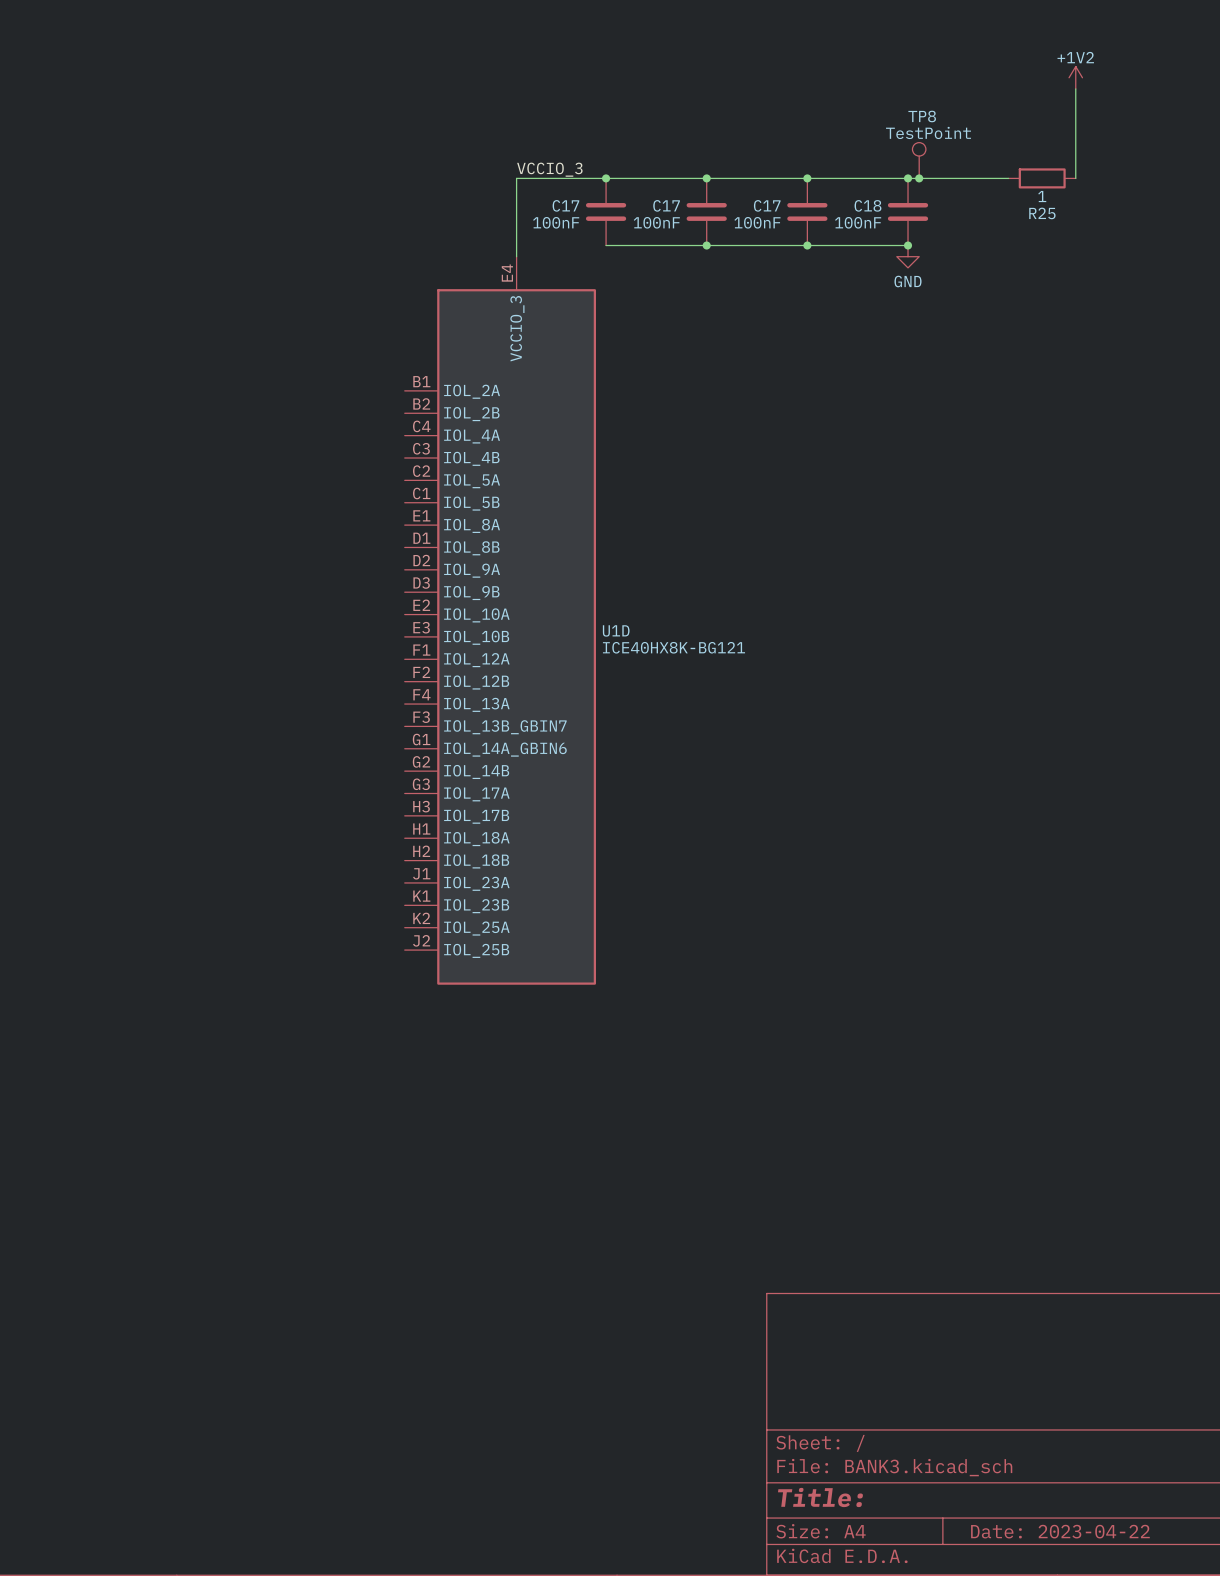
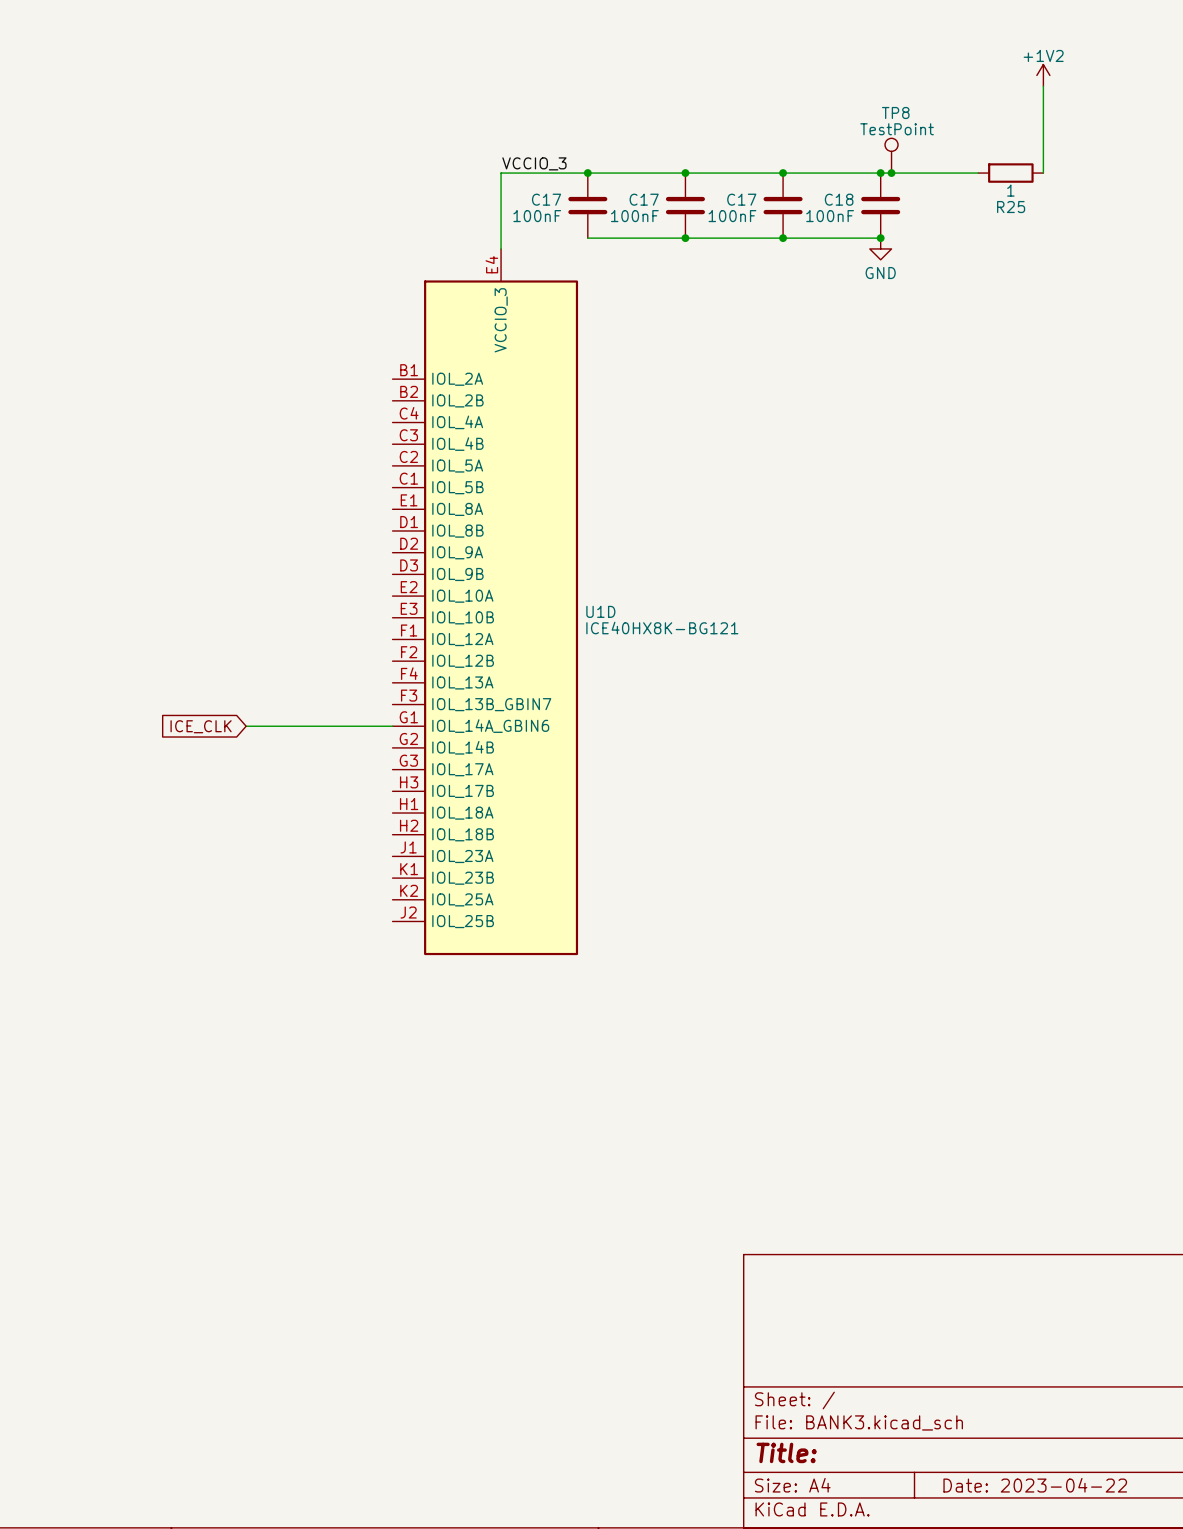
wire: none -> (246, 726) (392, 726)
global label: none -> ICE_CLK (201, 726)

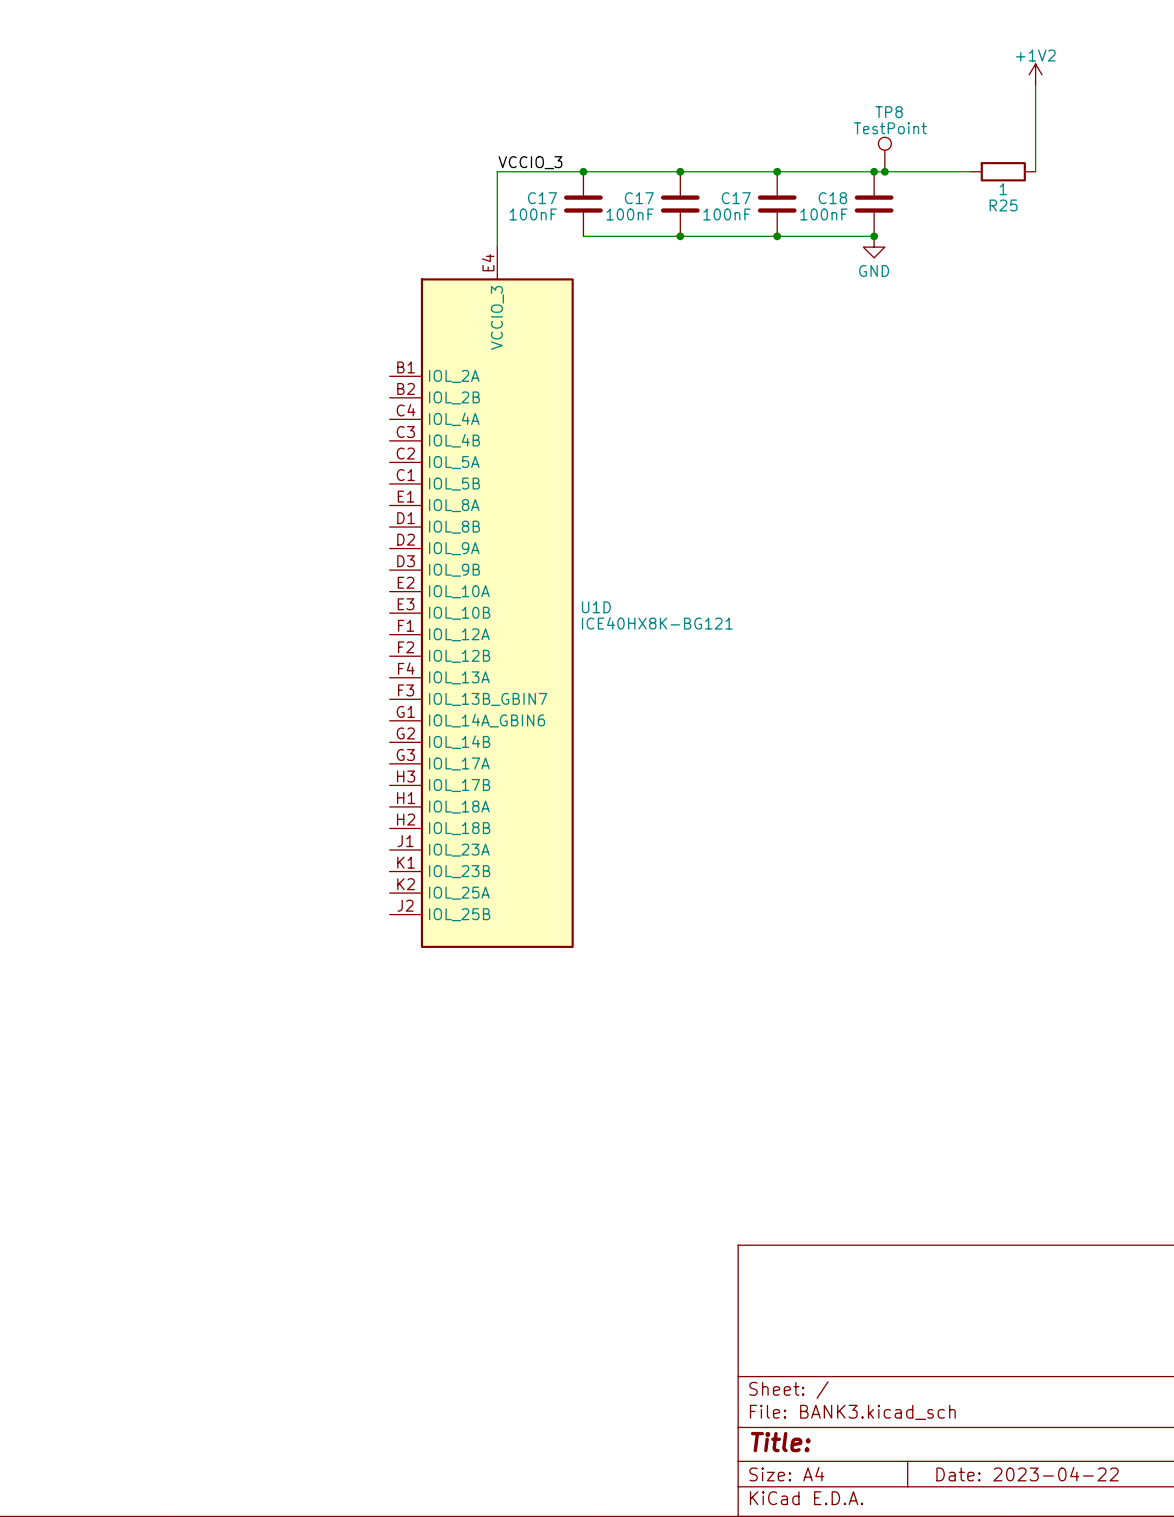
global label: ICE_CLK (201, 726) -> none
wire: (246, 726) (392, 726) -> none

